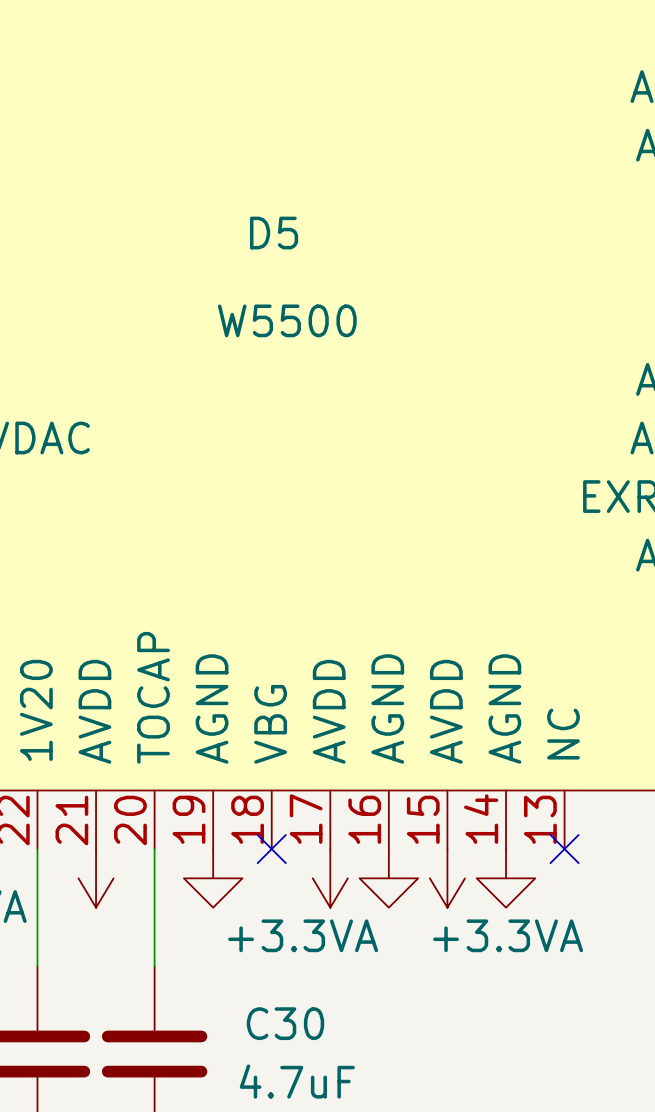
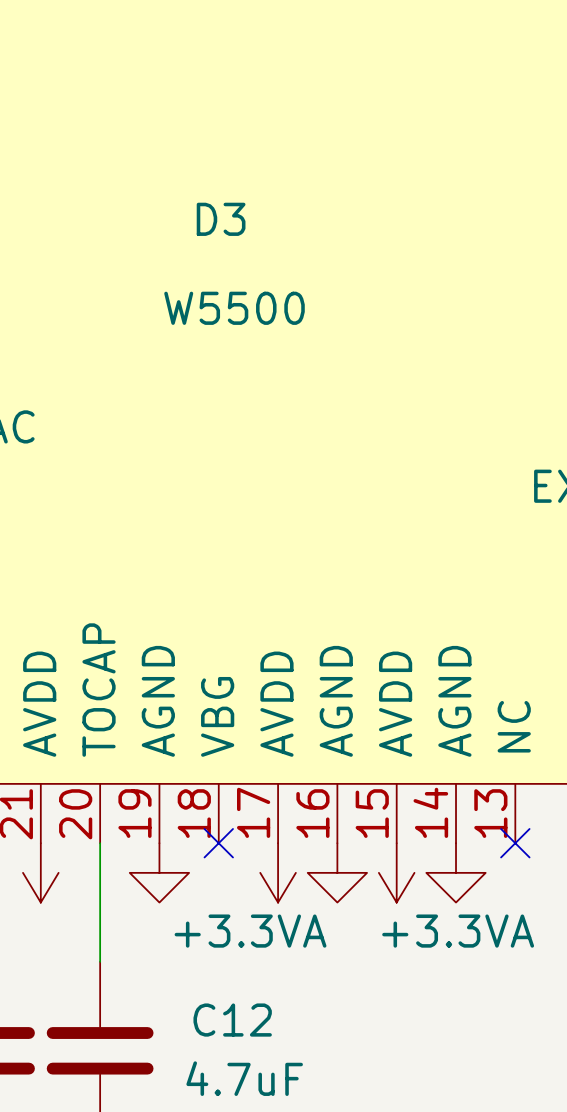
D5 name: D5 (274, 233) -> D3 (221, 219)
C30 name: C30 (285, 1023) -> C12 (232, 1020)

